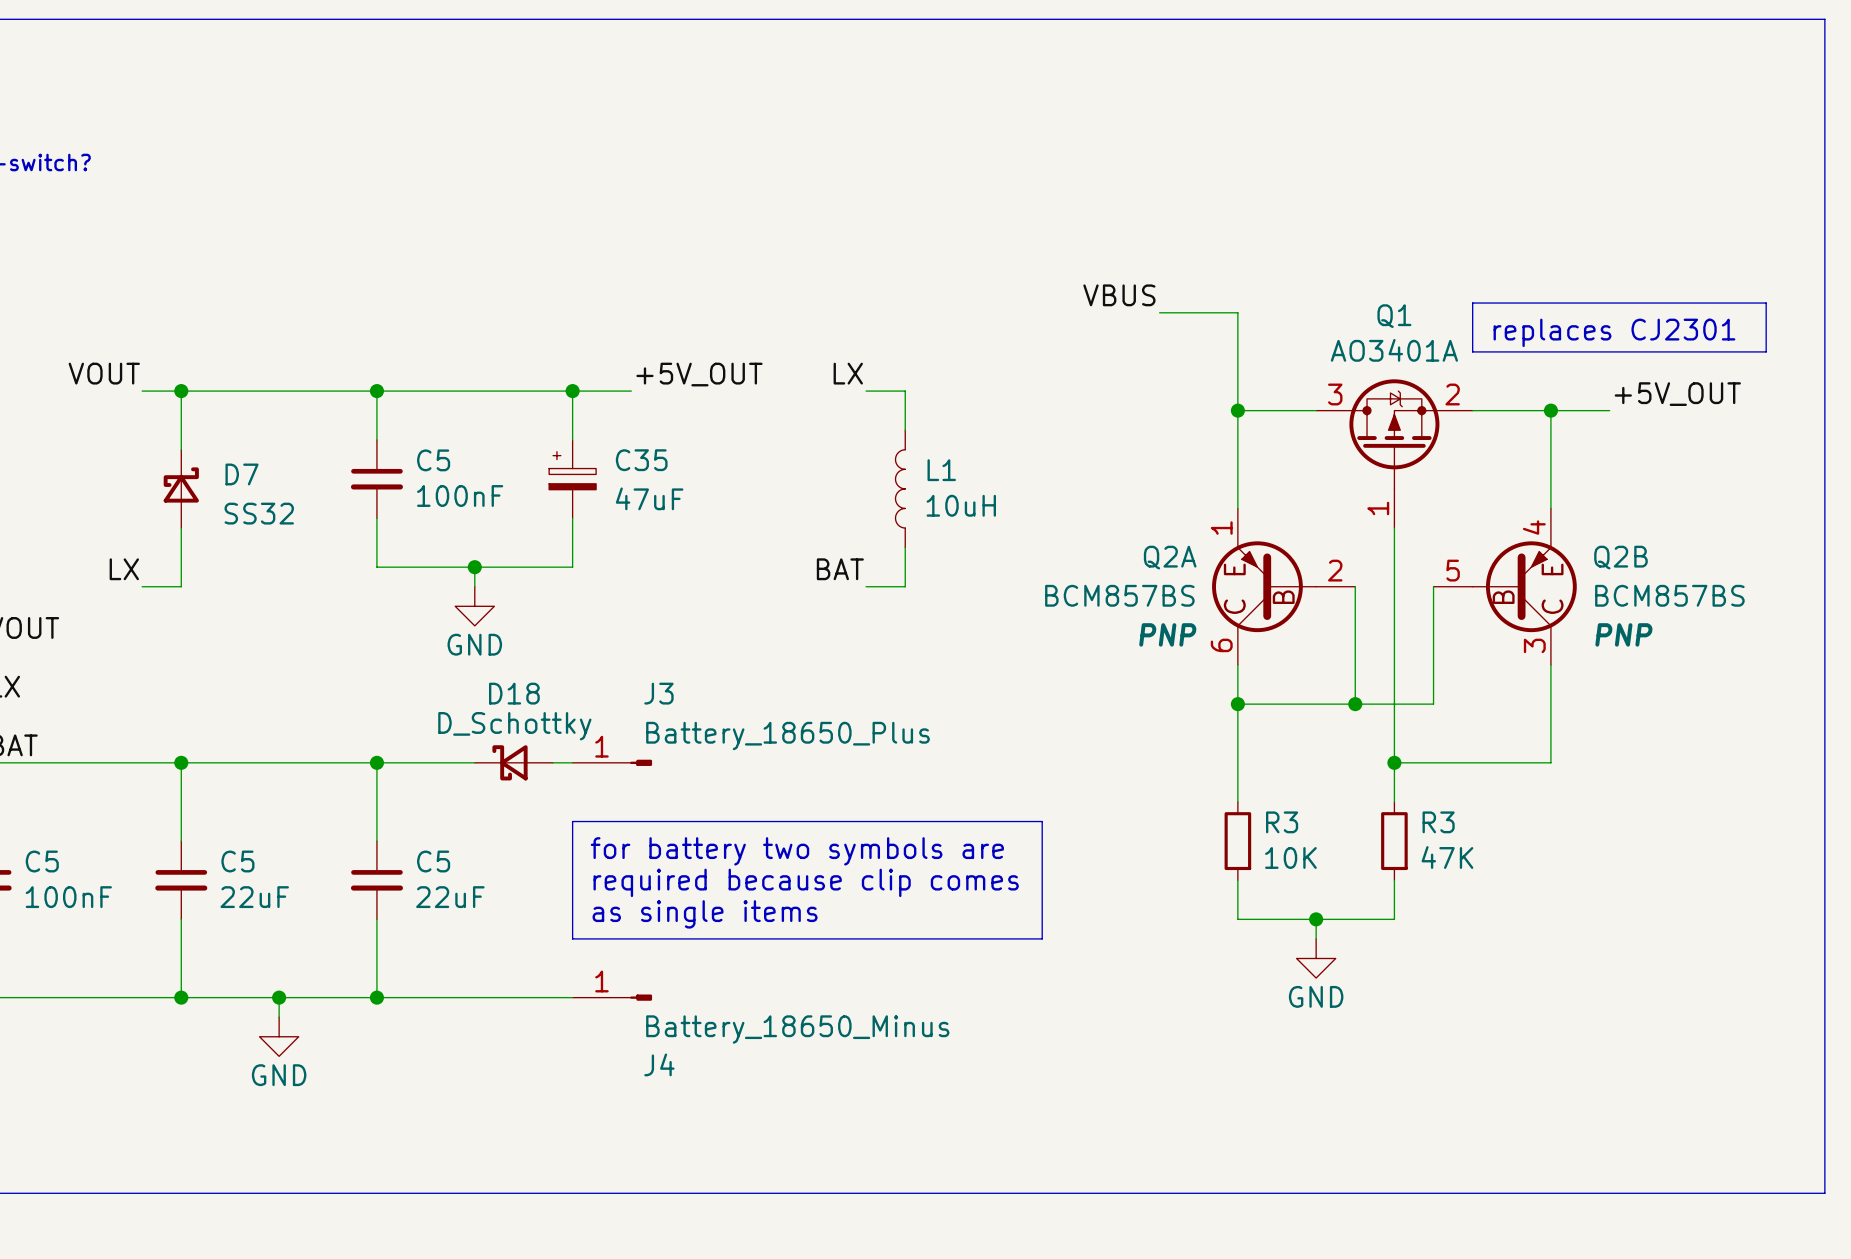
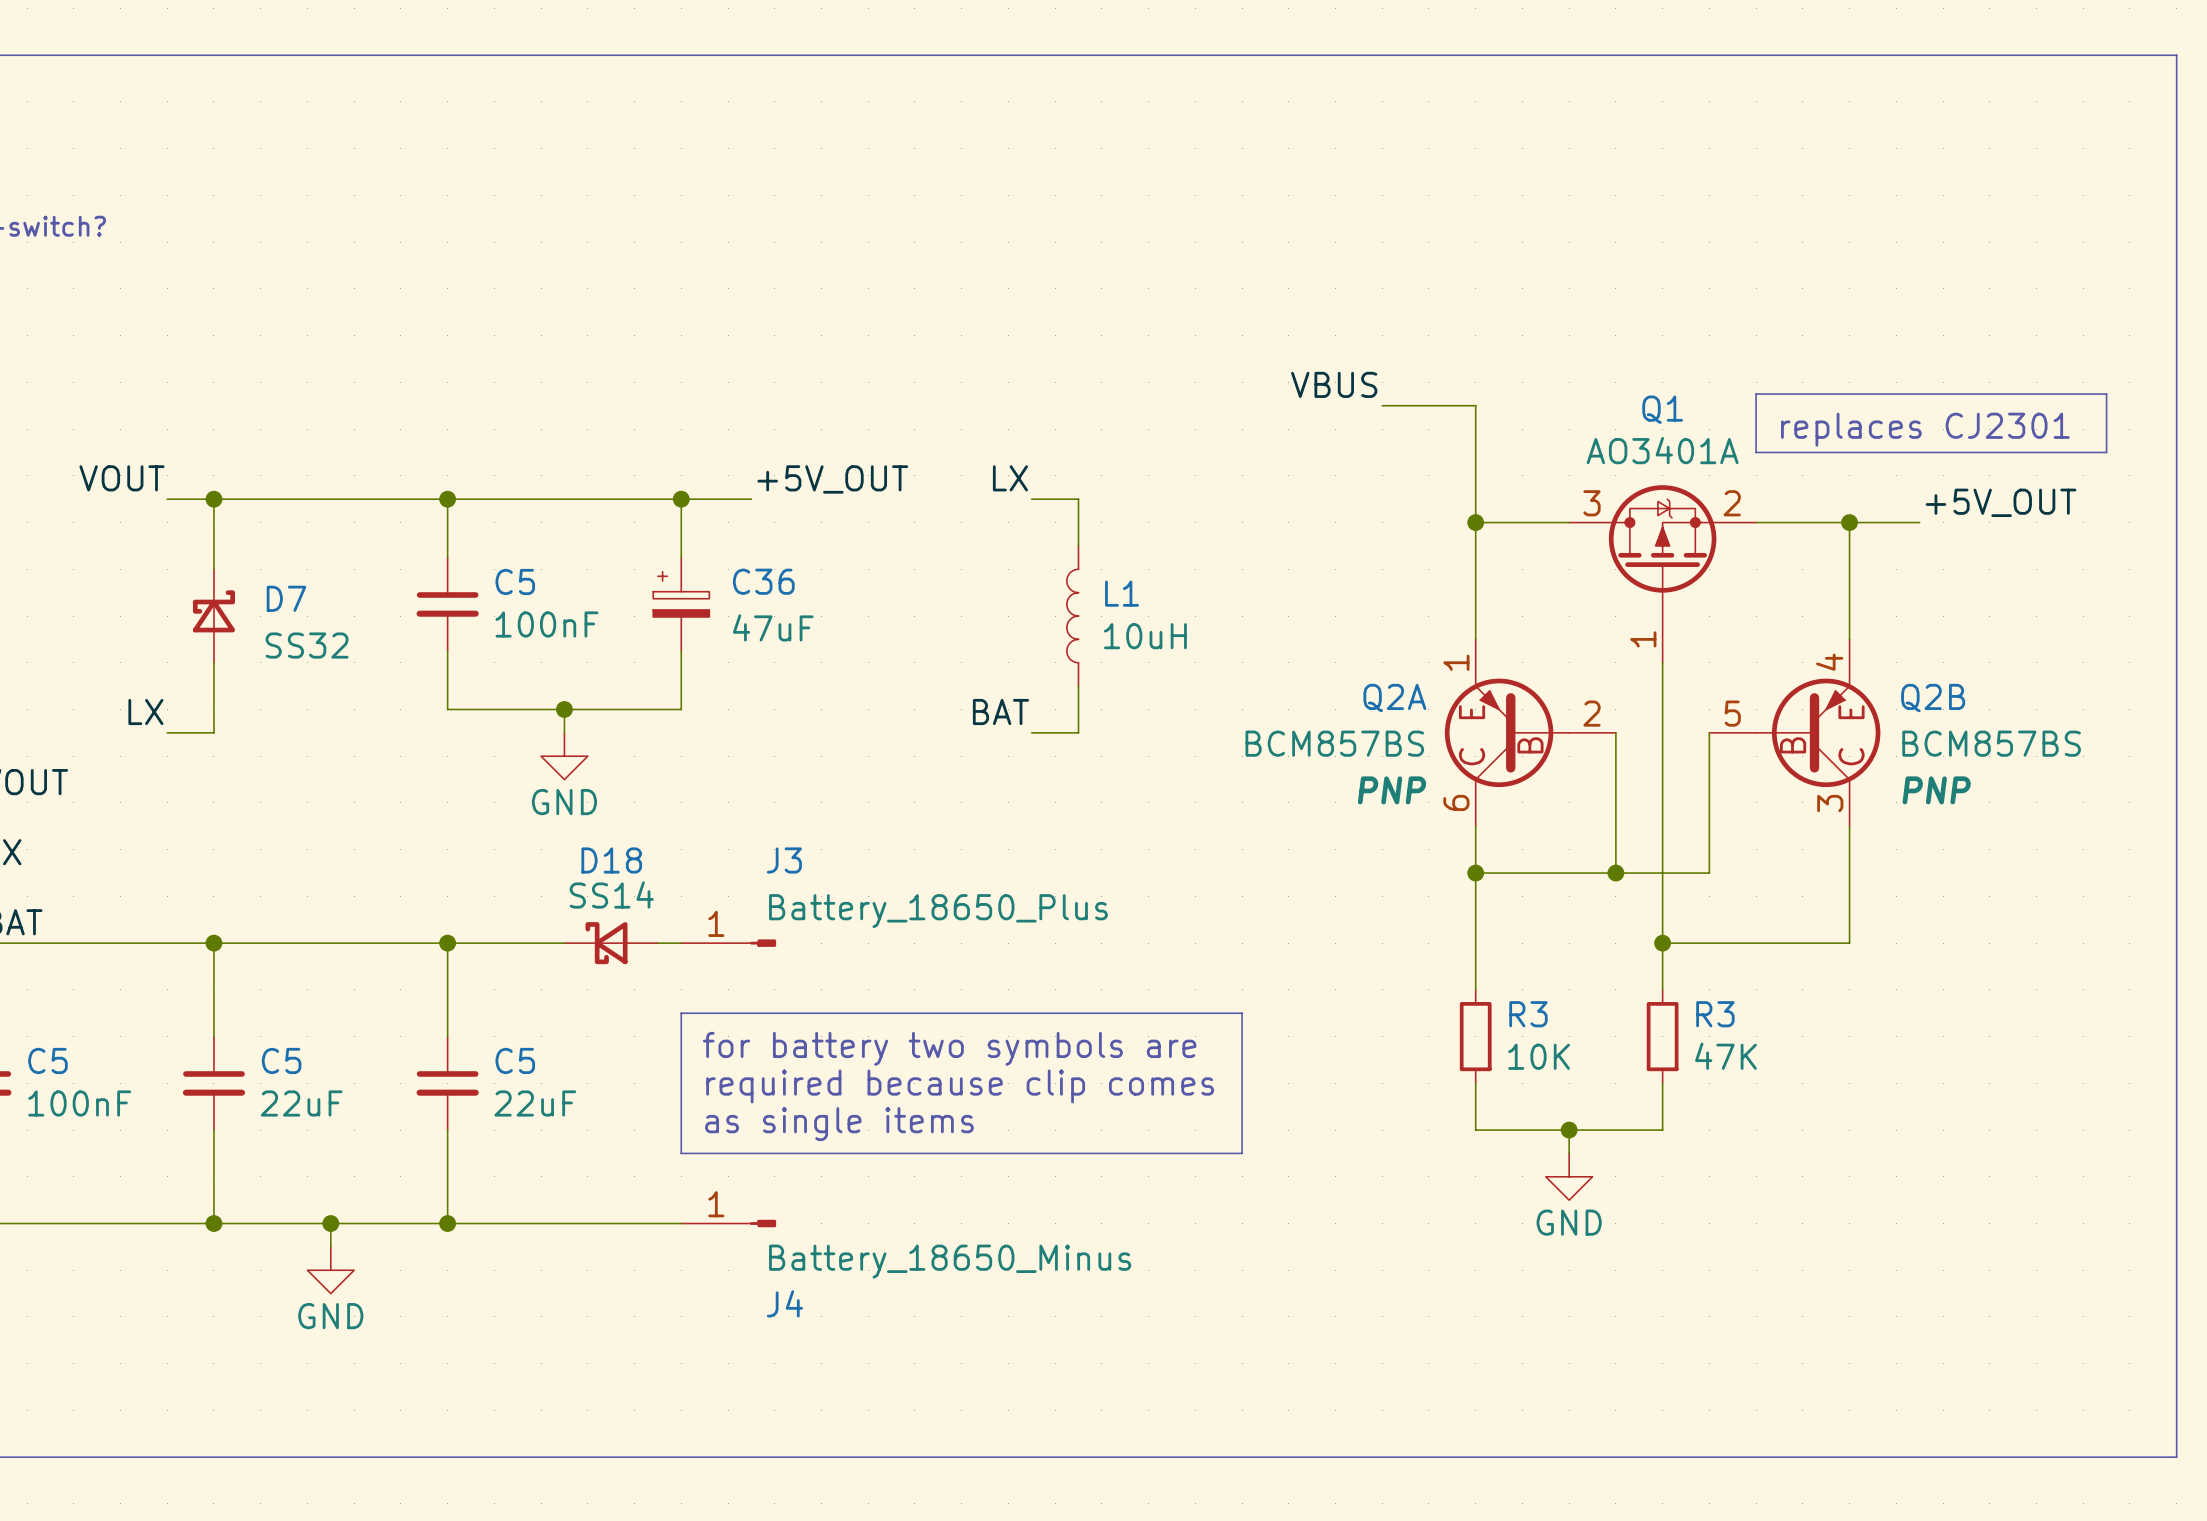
C35 name: C35 (641, 460) -> C36 (763, 581)
D18 value: D_Schottky (514, 726) -> SS14 (611, 894)

